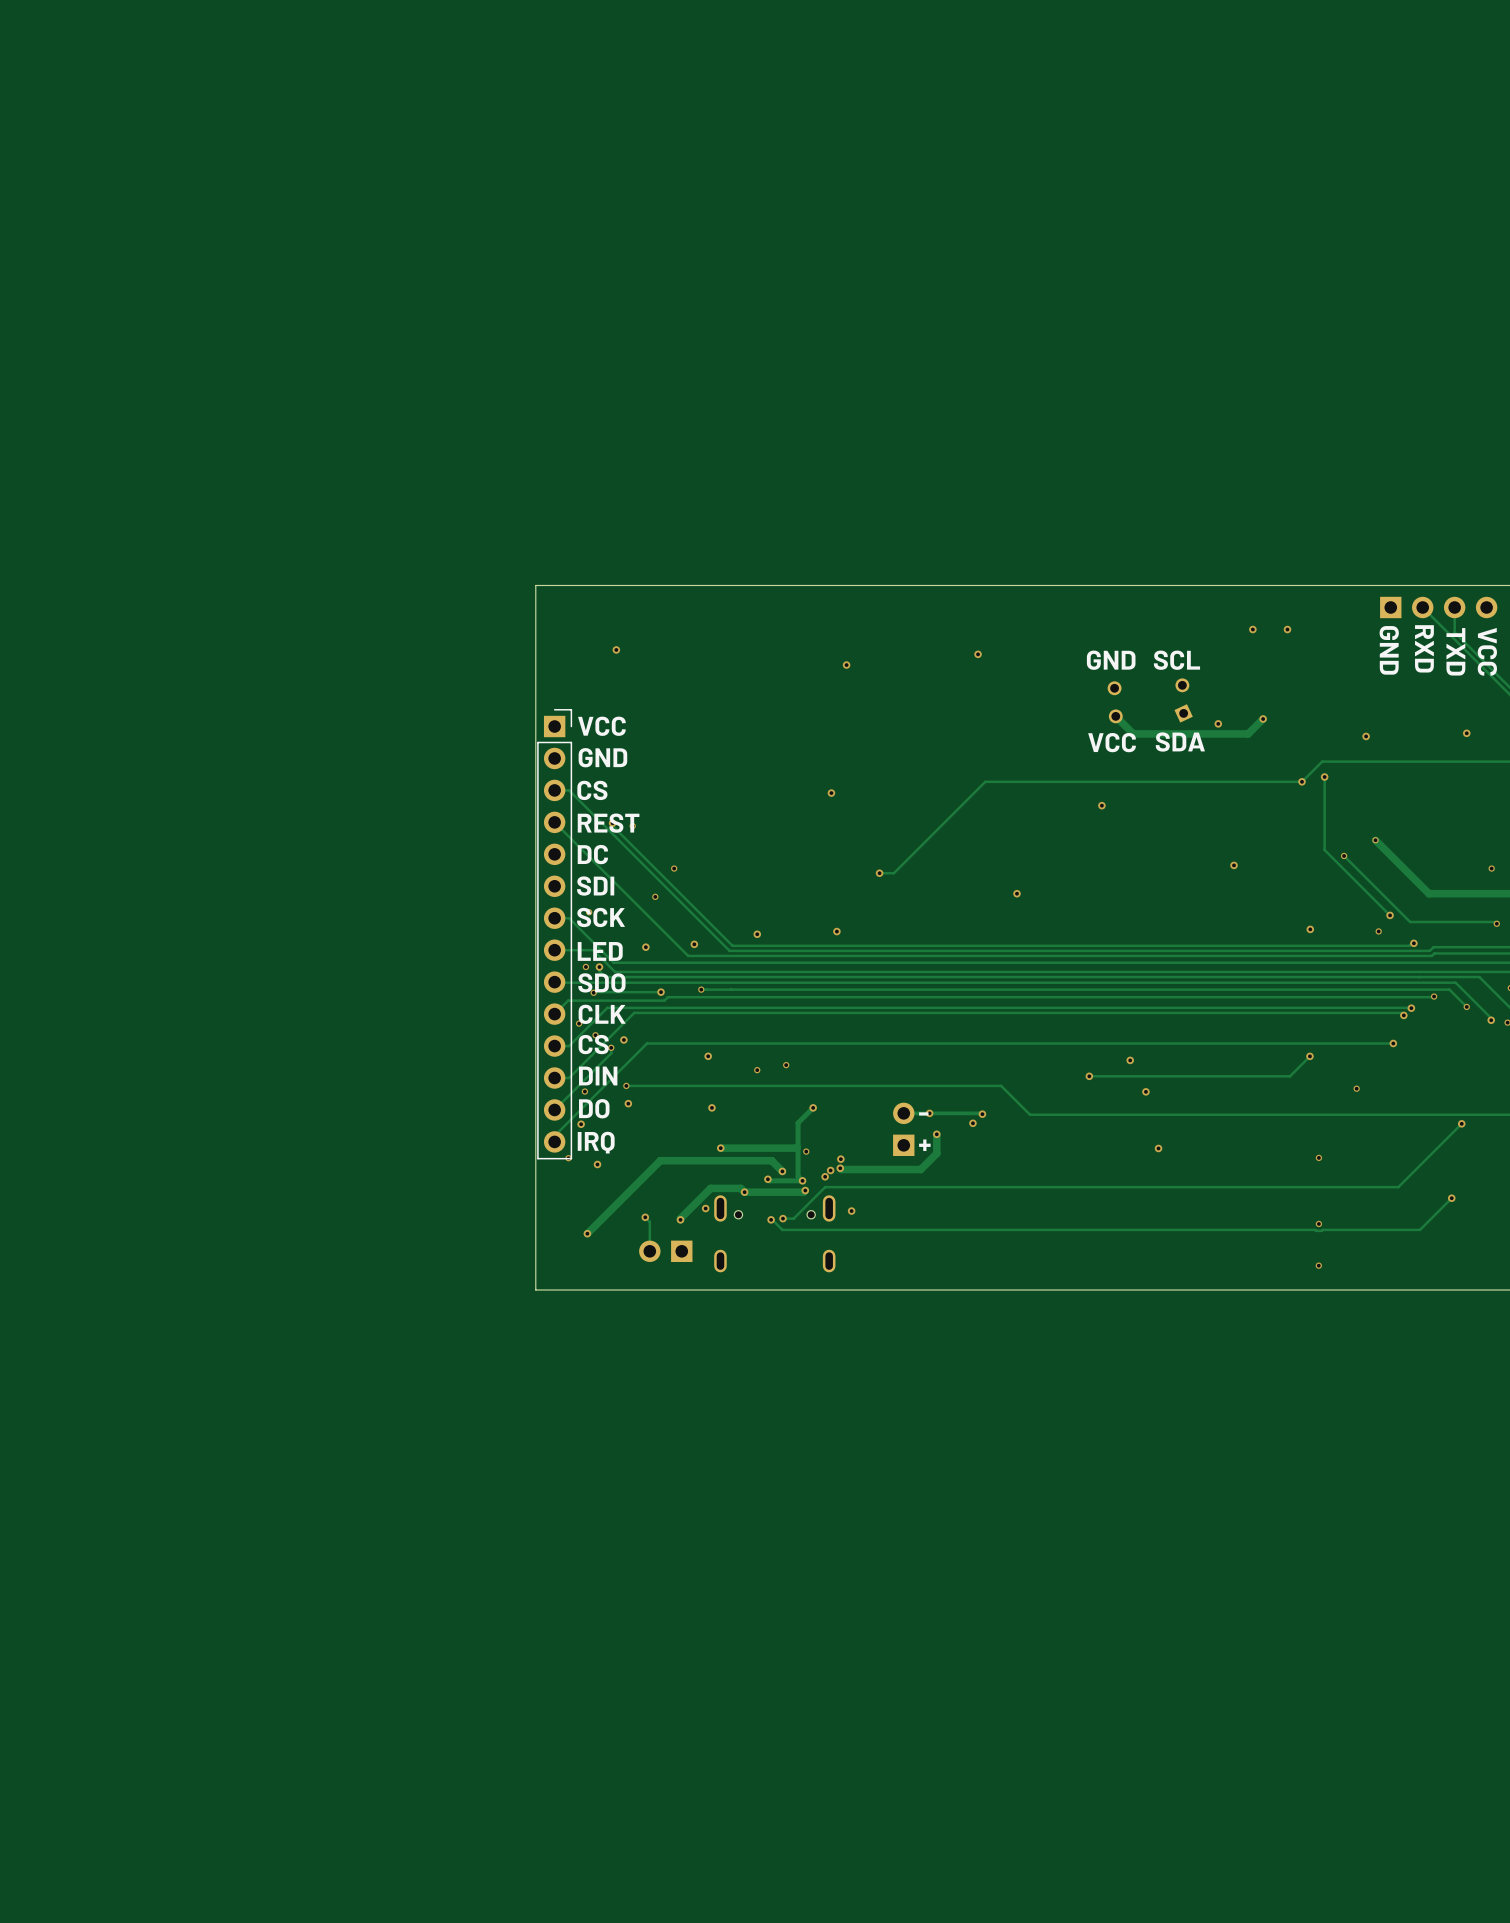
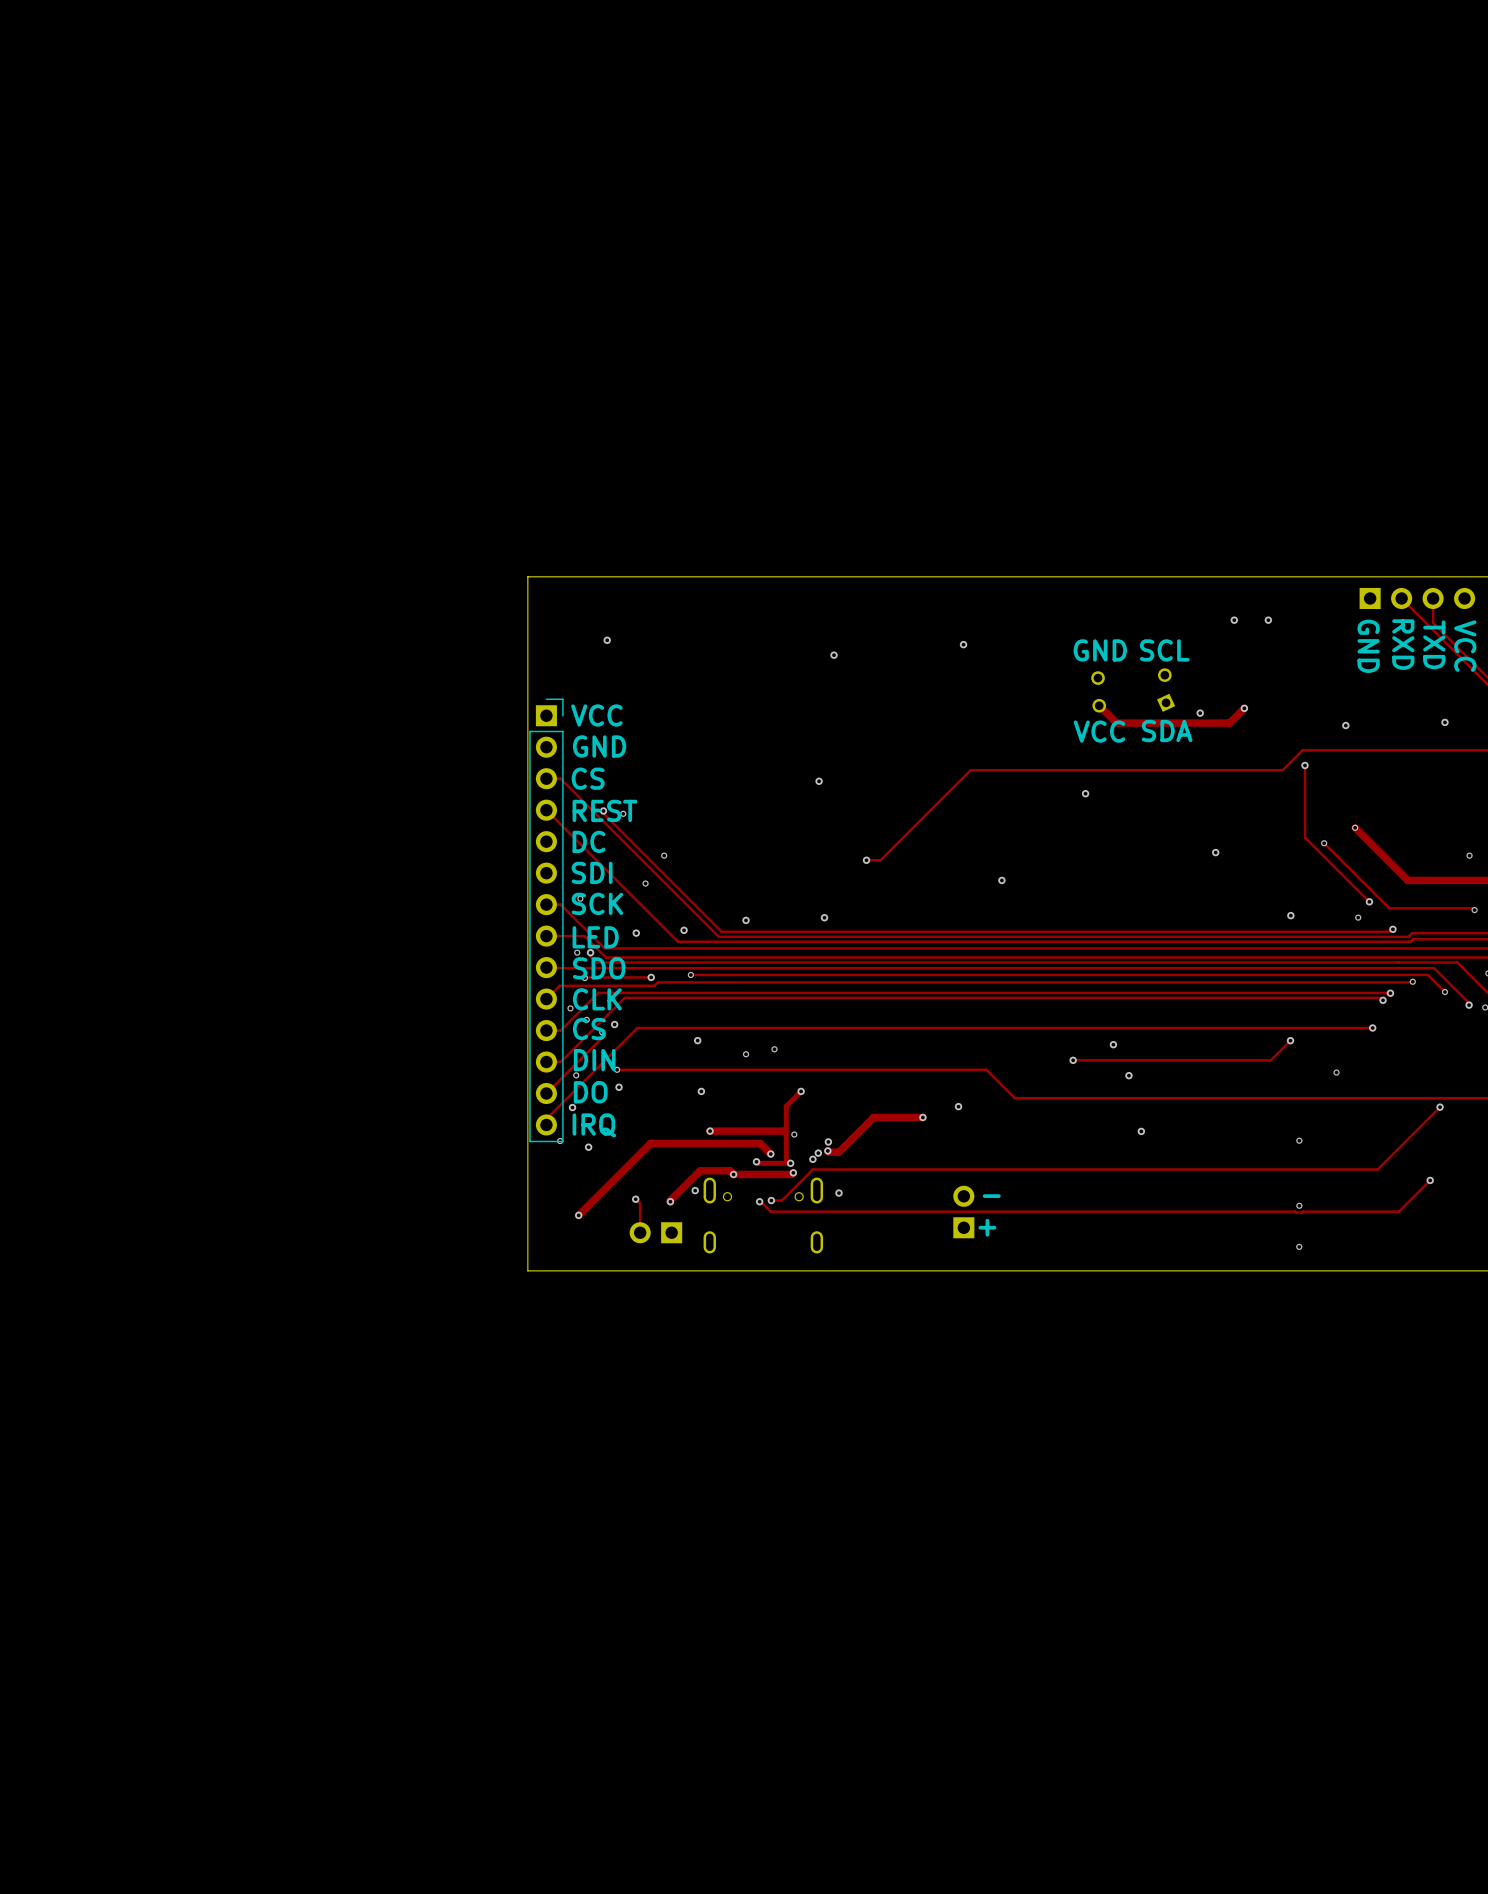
via: (1301, 781) -> none
track: (903, 1113) (982, 1114) -> none
text position: - (923, 1113) -> - (991, 1196)
via: (929, 1113) -> none
via: (982, 1114) -> none
part position: (903, 1129) -> (963, 1212)
track: (936, 1134) (936, 1153) (920, 1169) (851, 1169) -> (922, 1117) (873, 1117) (838, 1152)
text position: + (924, 1145) -> + (987, 1227)

